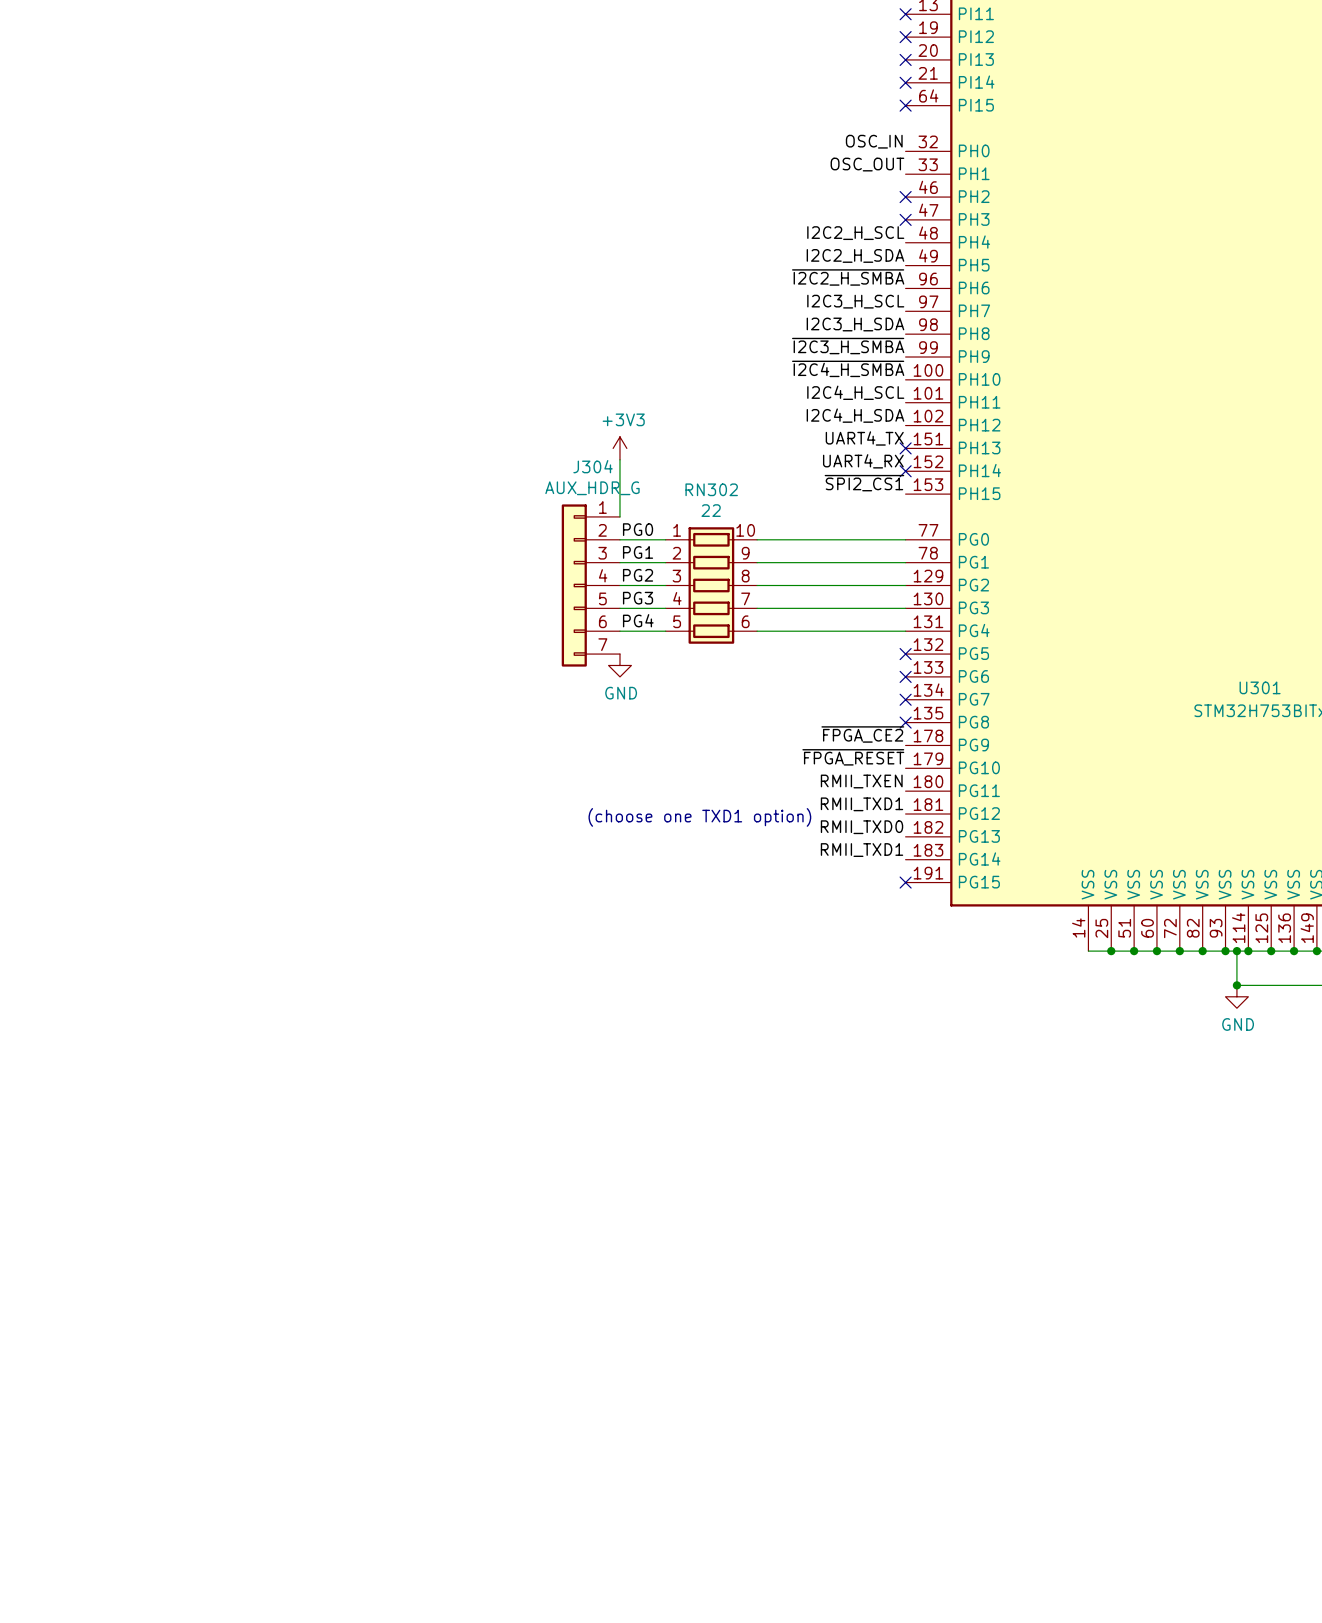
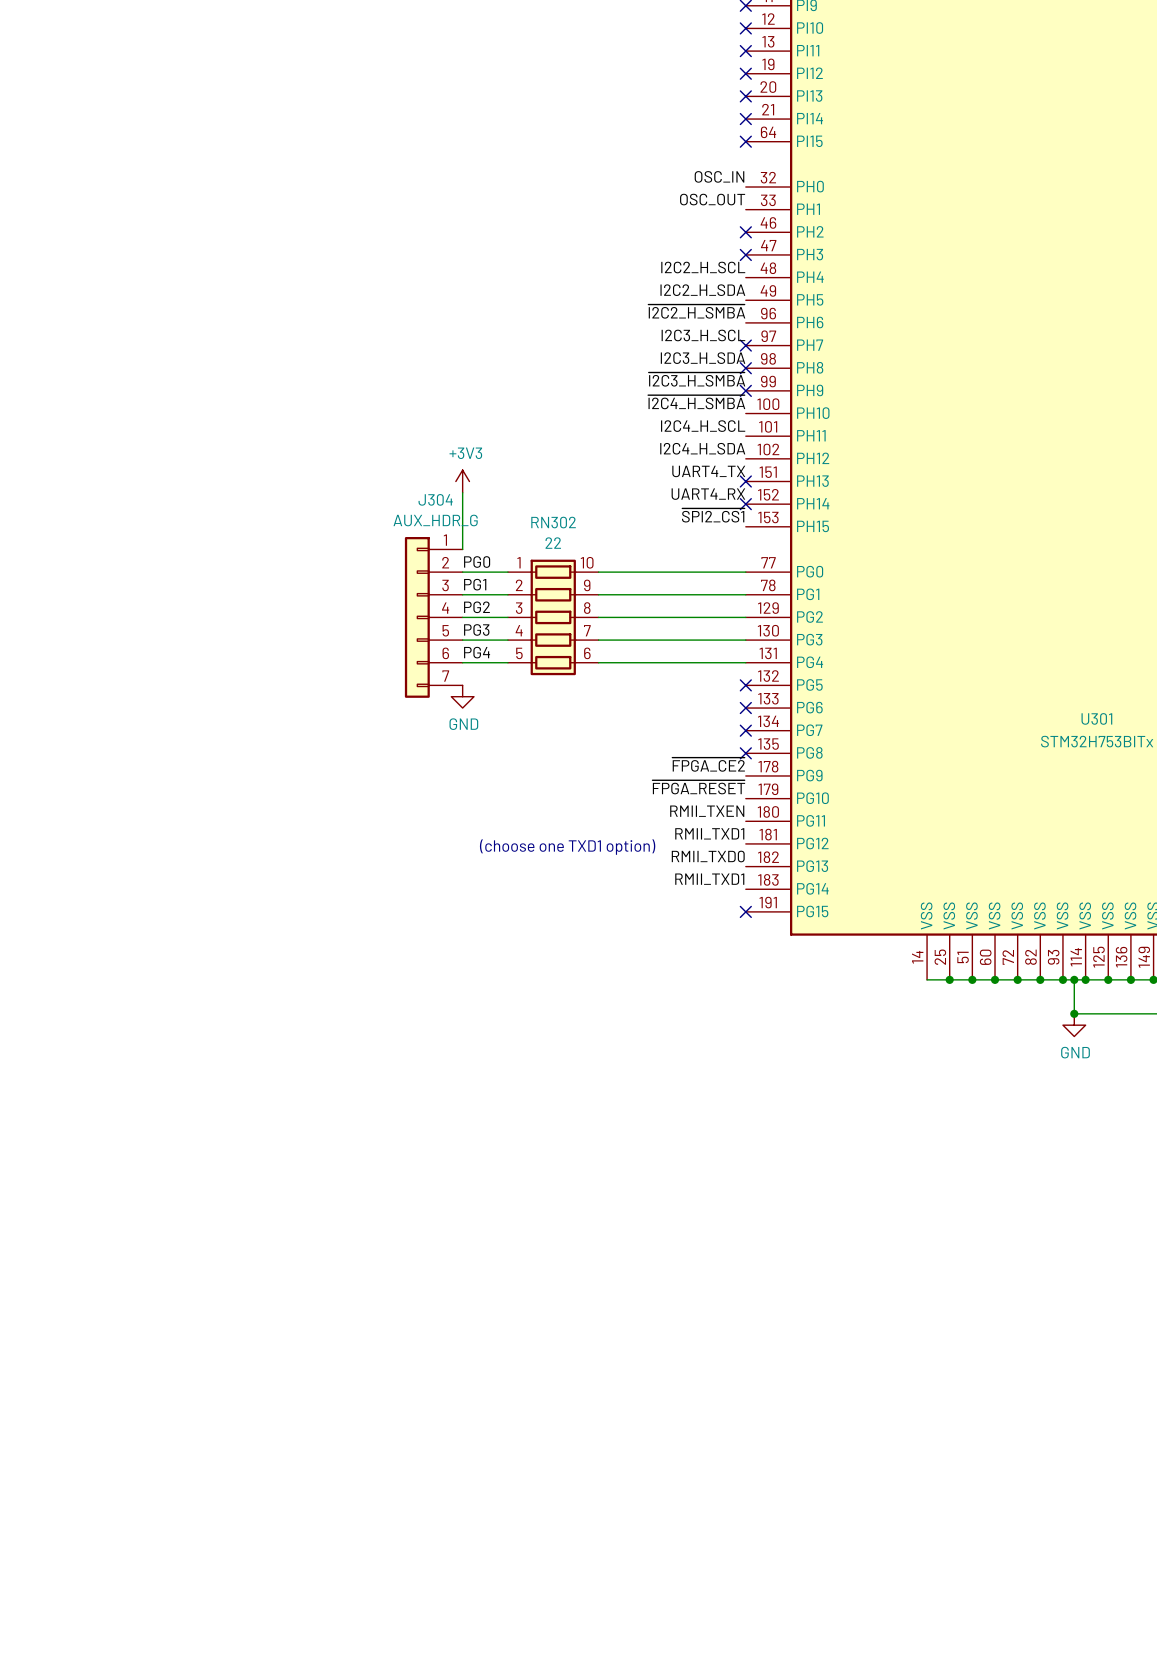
no-connect mark: none -> (745, 345)
no-connect mark: none -> (745, 368)
no-connect mark: none -> (745, 390)

